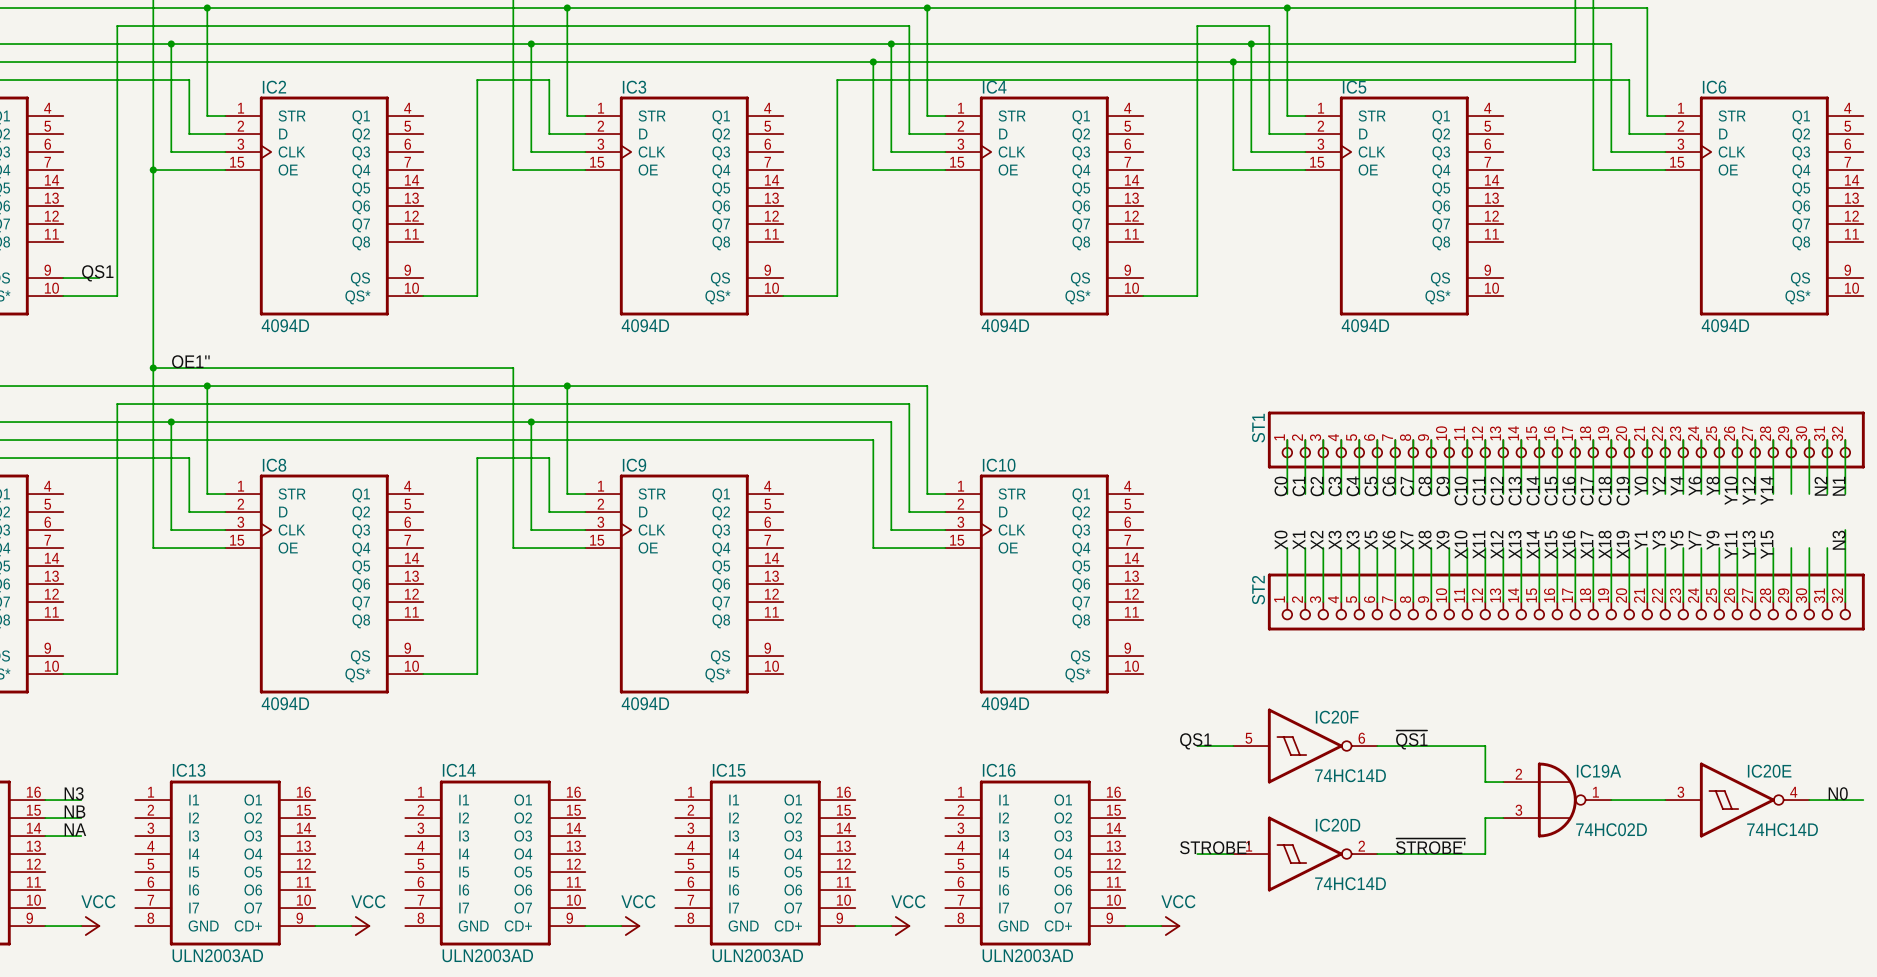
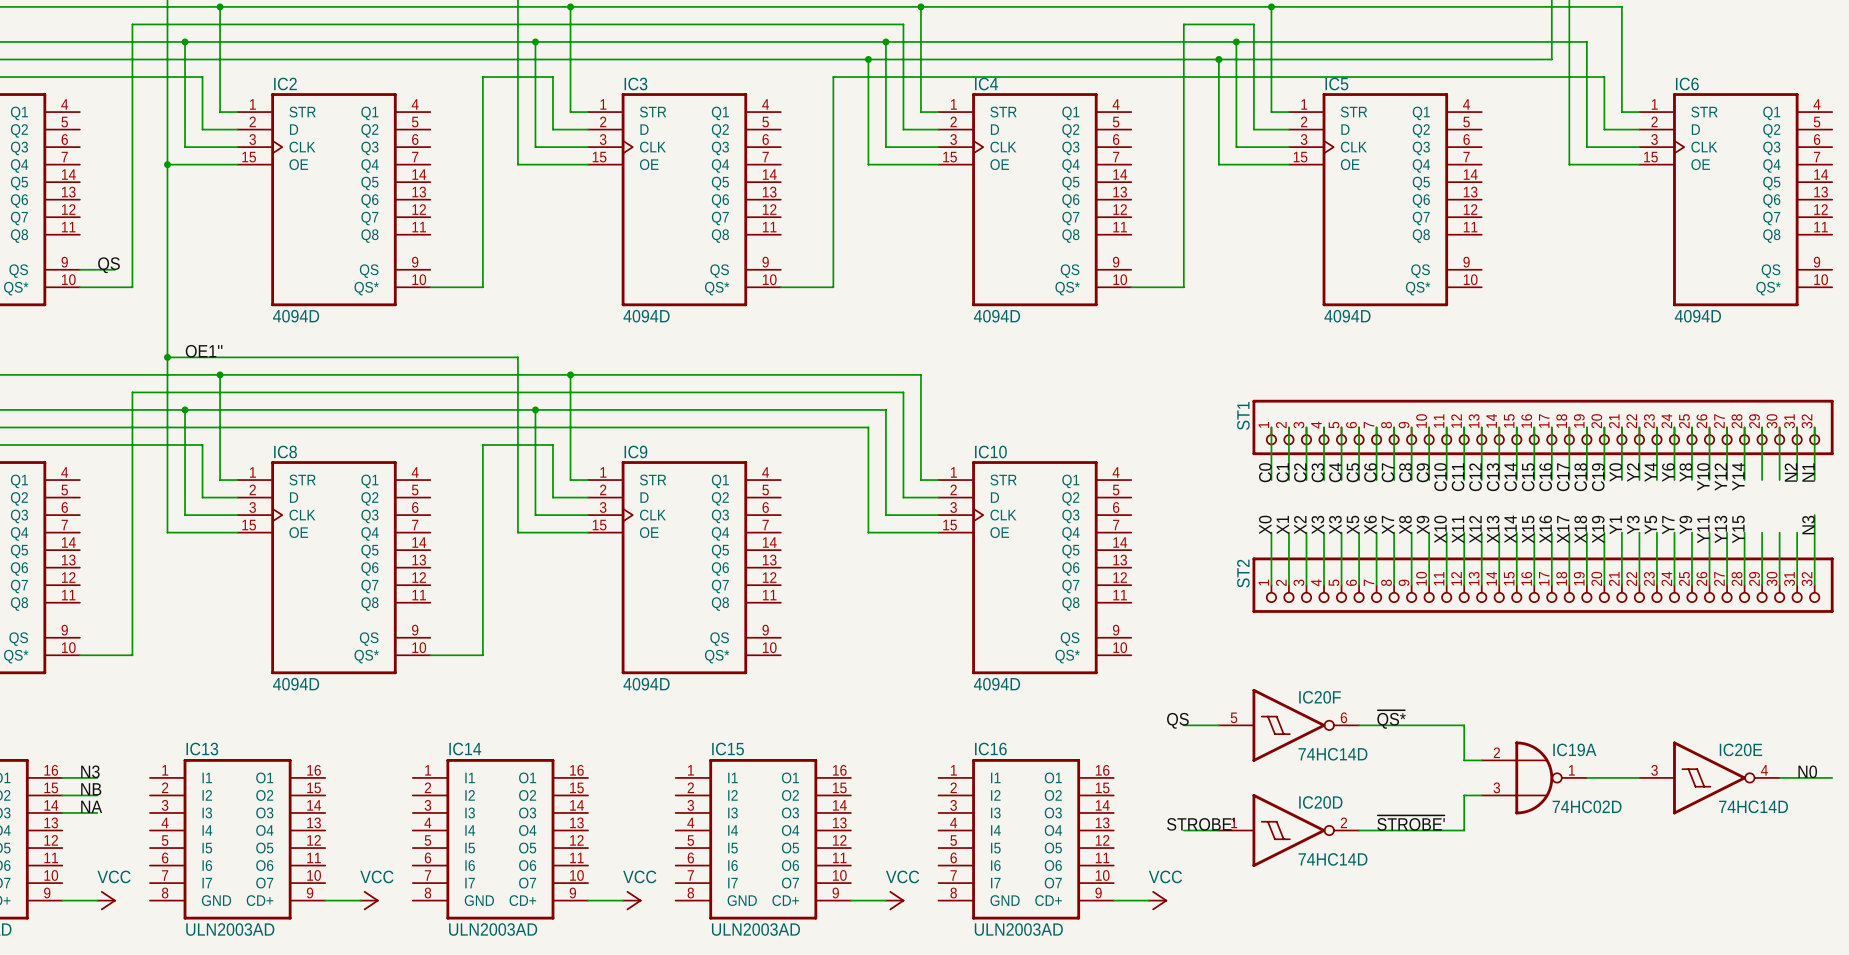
label: QS1 (97, 273) -> QS (109, 265)
label: ~{QS1} (1411, 740) -> ~{QS*} (1391, 719)
label: QS1 (1195, 741) -> QS (1177, 720)

